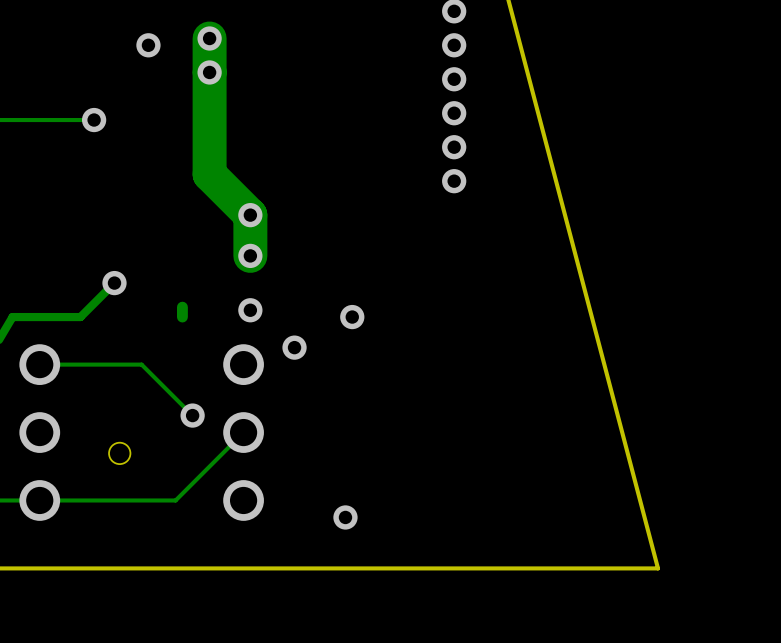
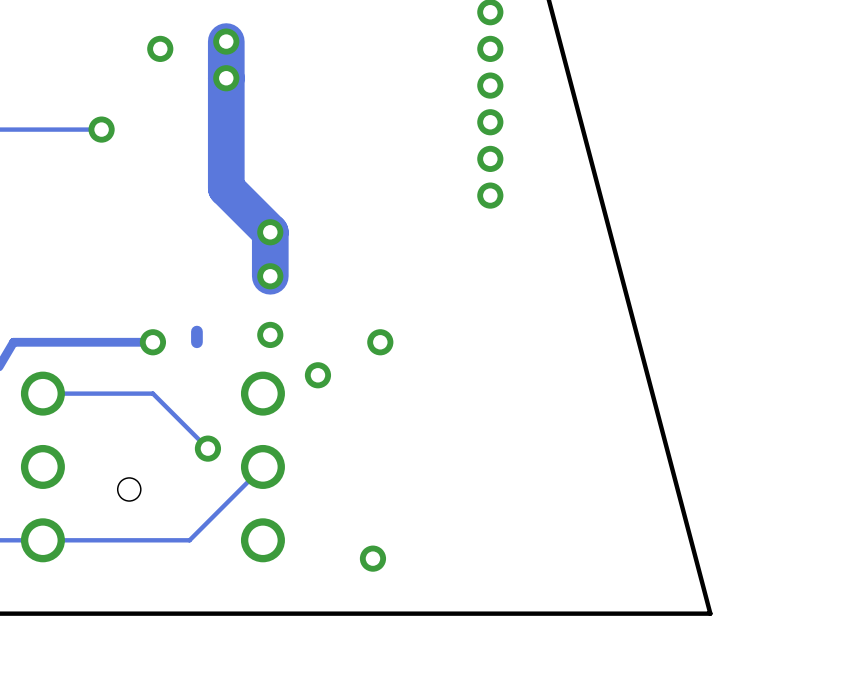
track: (114, 283) (80, 317) -> (152, 342) (86, 342)
via position: (114, 283) -> (152, 342)

